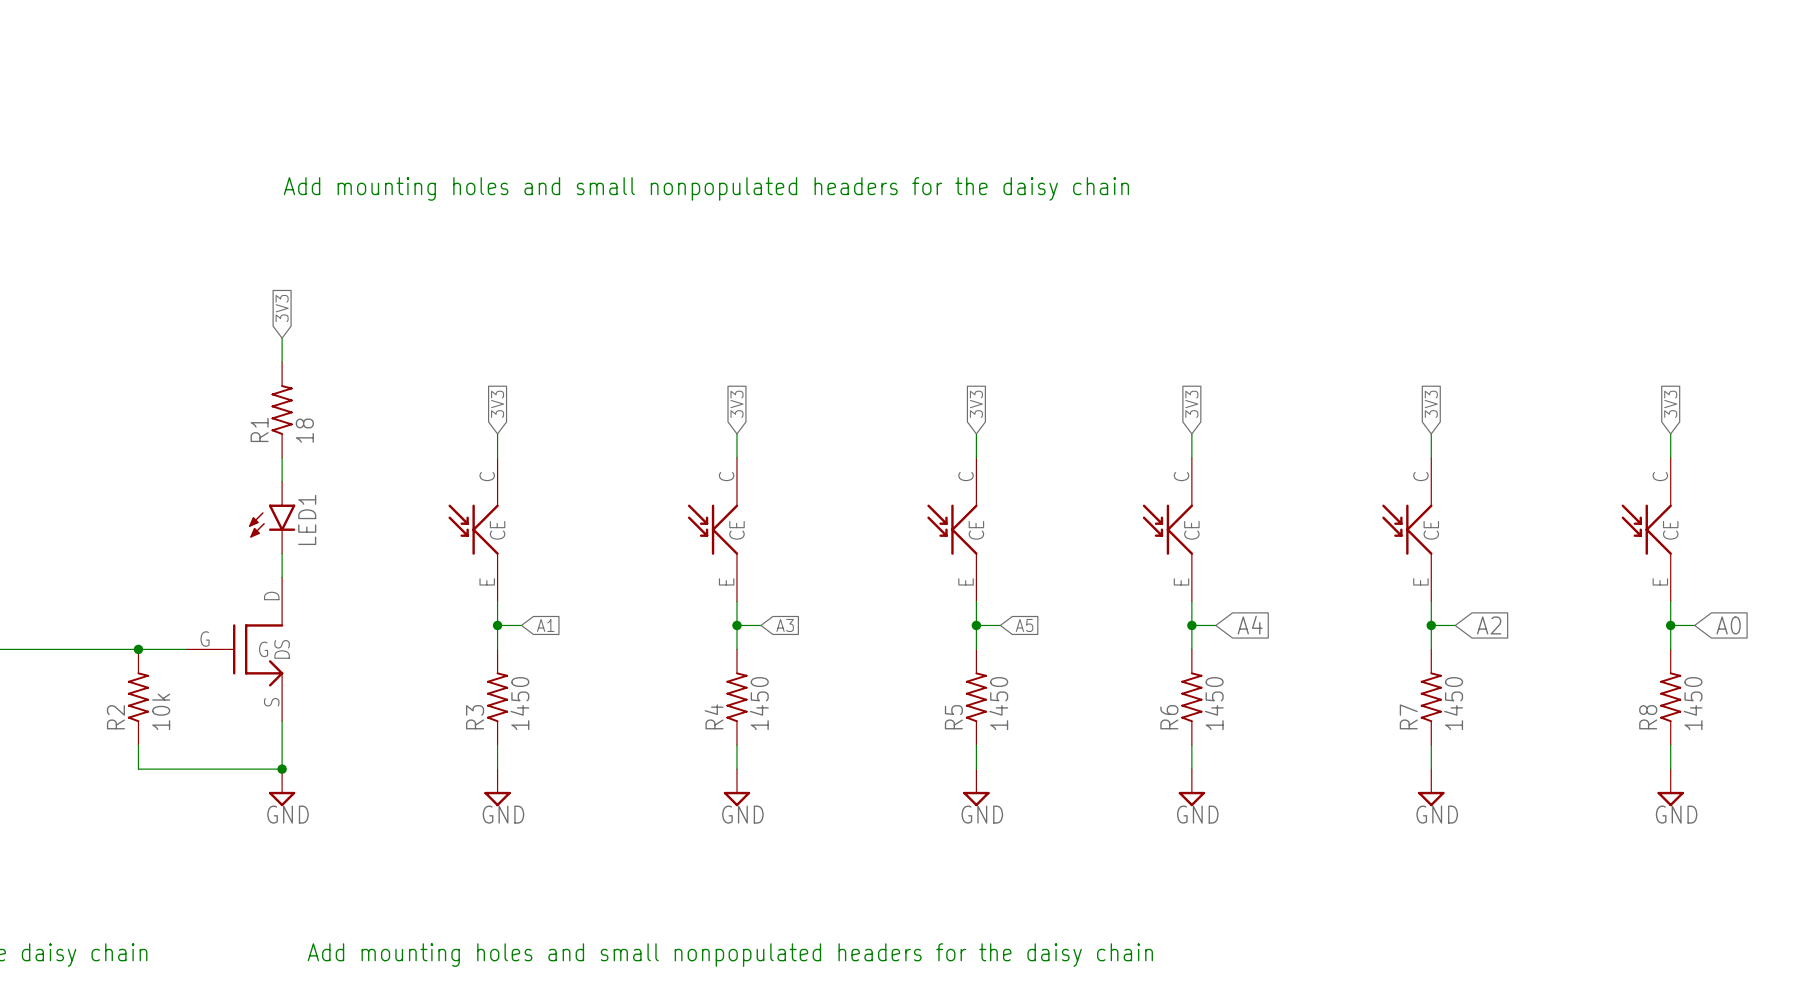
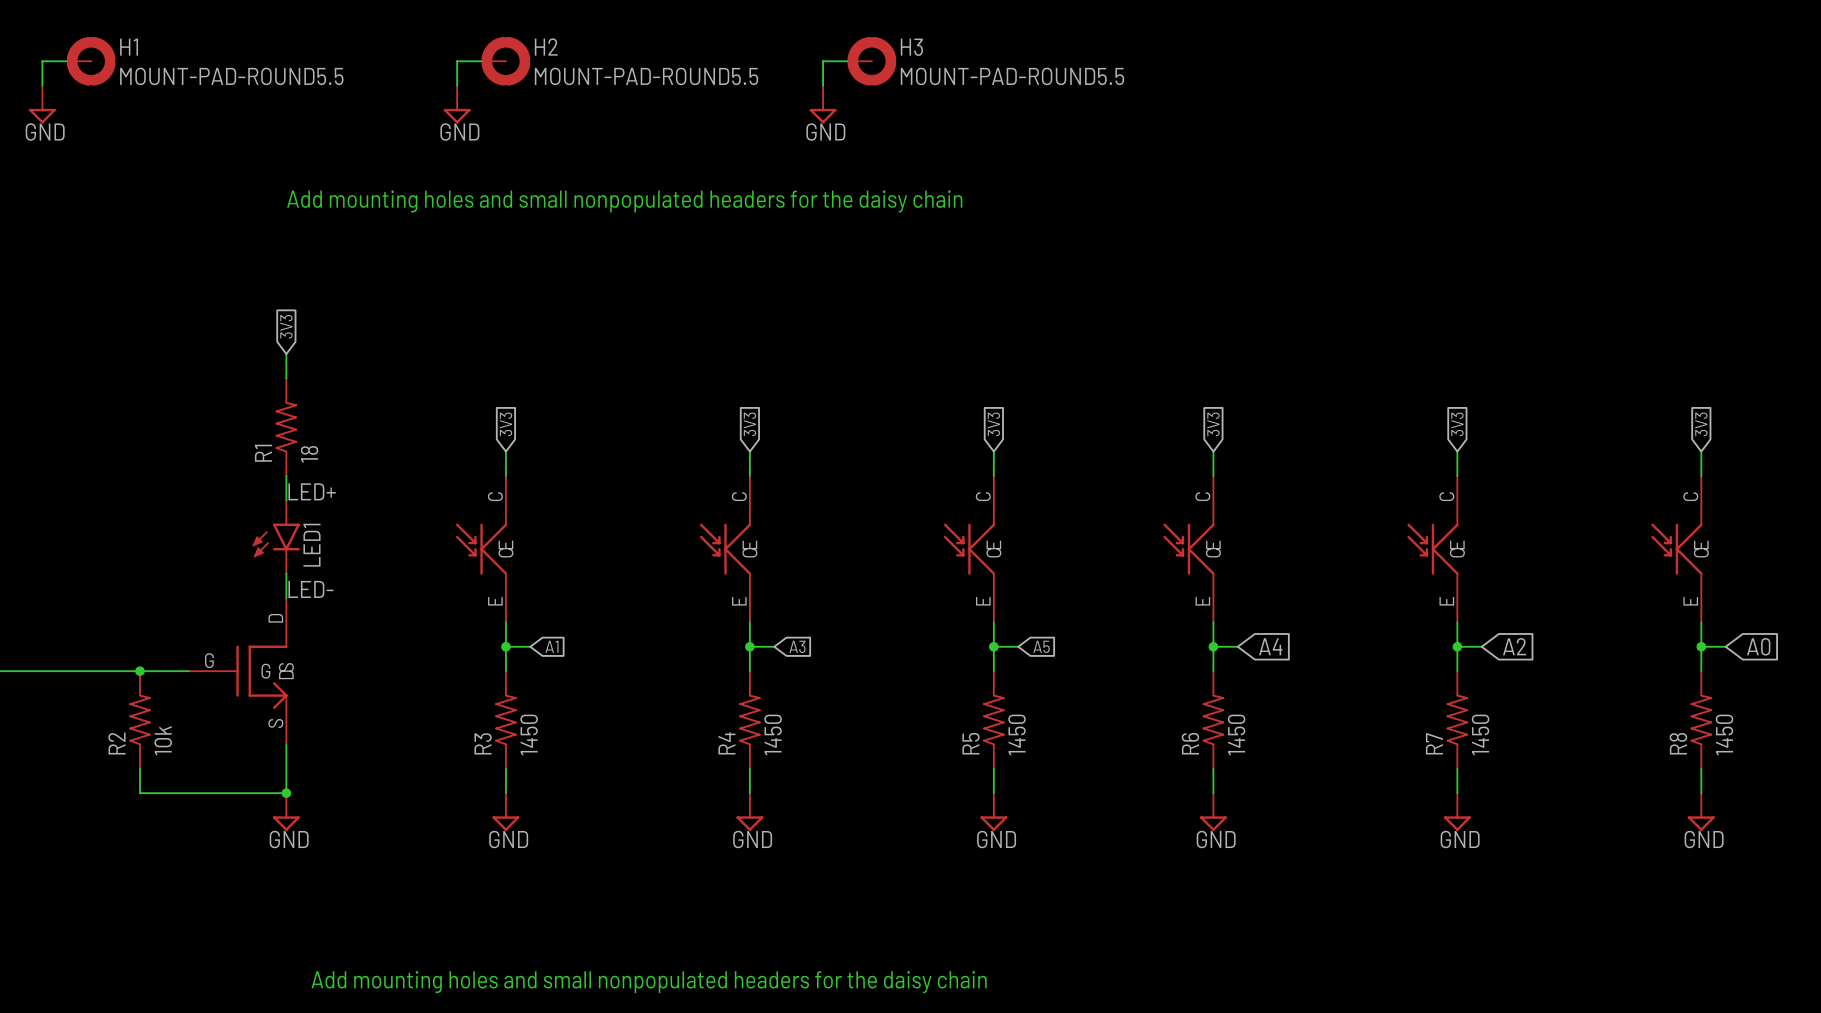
wire: none -> (66, 61) (42, 61) (42, 85)
H1: none -> MOUNT-PAD-ROUND5.5 (91, 61)
wire: none -> (481, 61) (457, 61) (457, 85)
H2: none -> MOUNT-PAD-ROUND5.5 (505, 61)
wire: none -> (847, 61) (823, 61) (823, 85)
H3: none -> MOUNT-PAD-ROUND5.5 (871, 61)
power symbol: none -> GND (42, 104)
power symbol: none -> GND (457, 104)
power symbol: none -> GND (823, 104)
label: none -> LED+ (312, 491)
label: none -> LED- (310, 589)

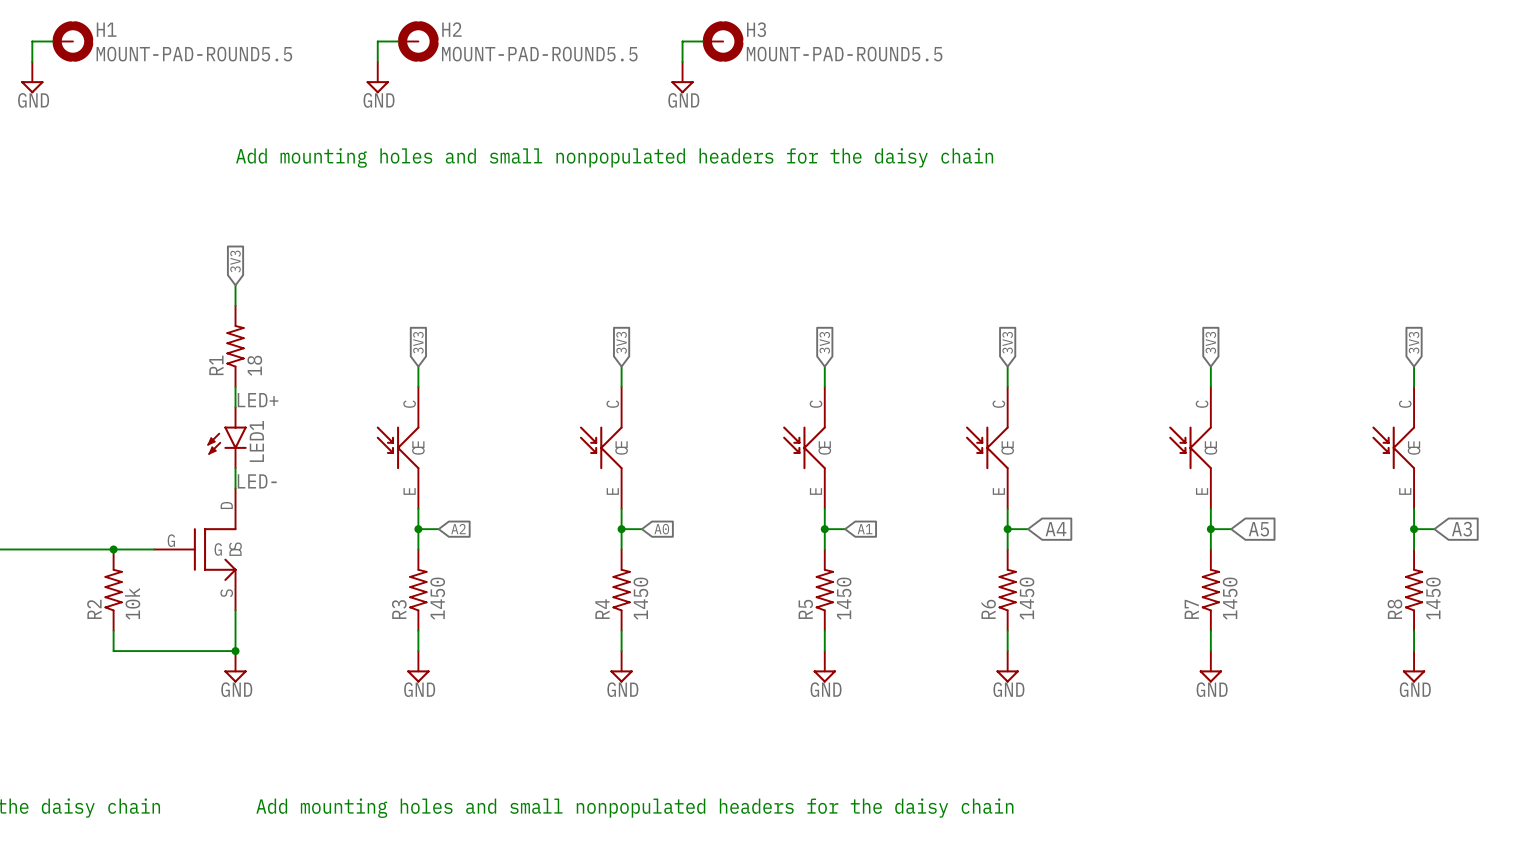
global label: A1 (552, 646) -> A2 (458, 529)
global label: A3 (797, 646) -> A0 (661, 529)
global label: A5 (1041, 646) -> A1 (865, 529)
global label: A2 (1514, 646) -> A5 (1258, 529)
global label: A0 (1758, 646) -> A3 (1461, 529)

